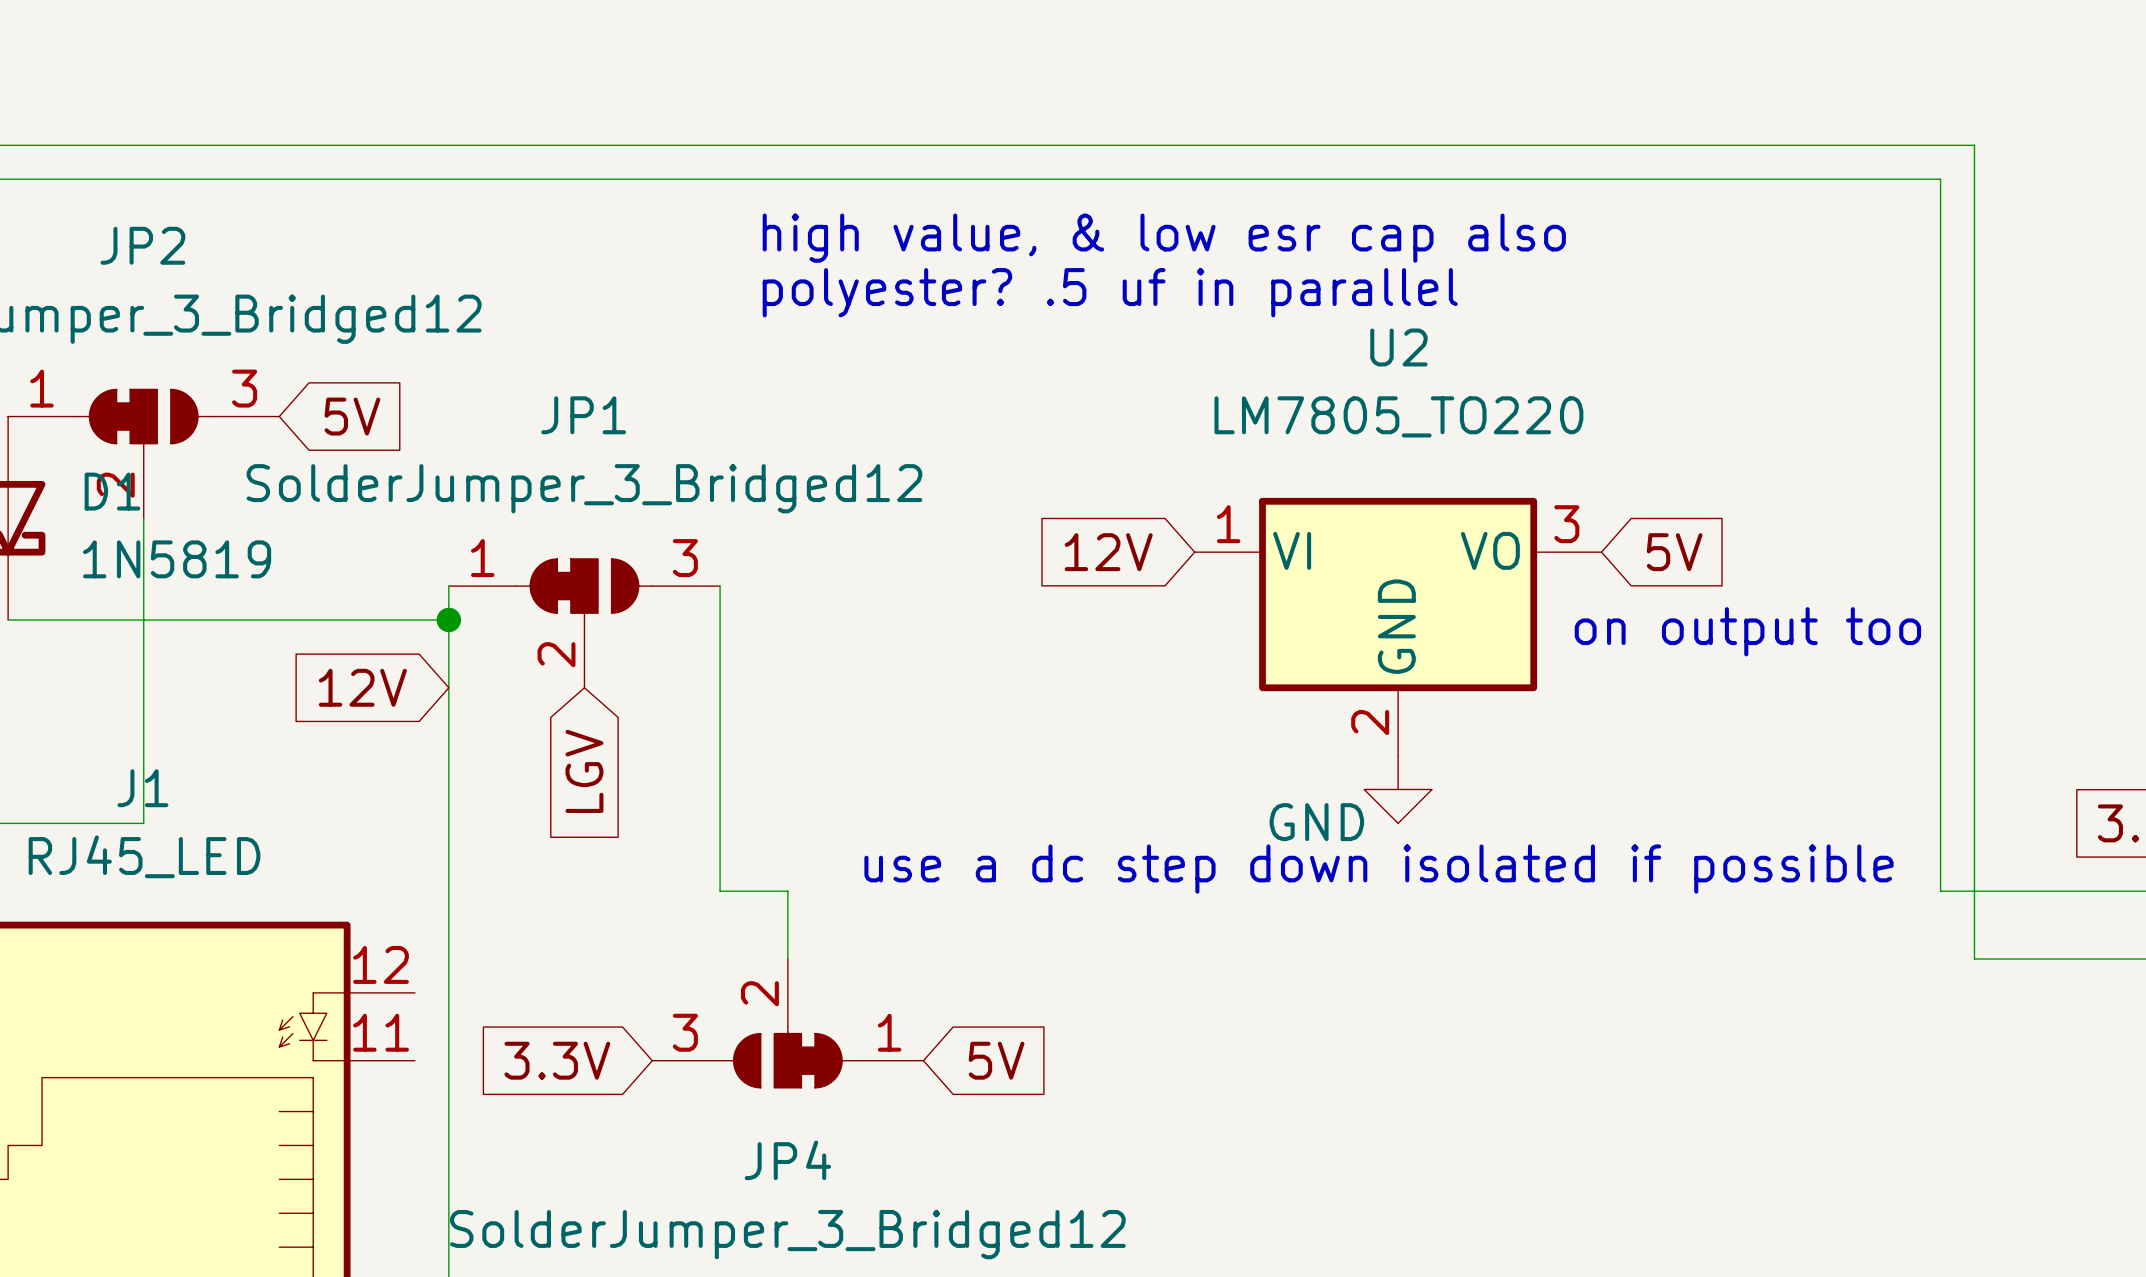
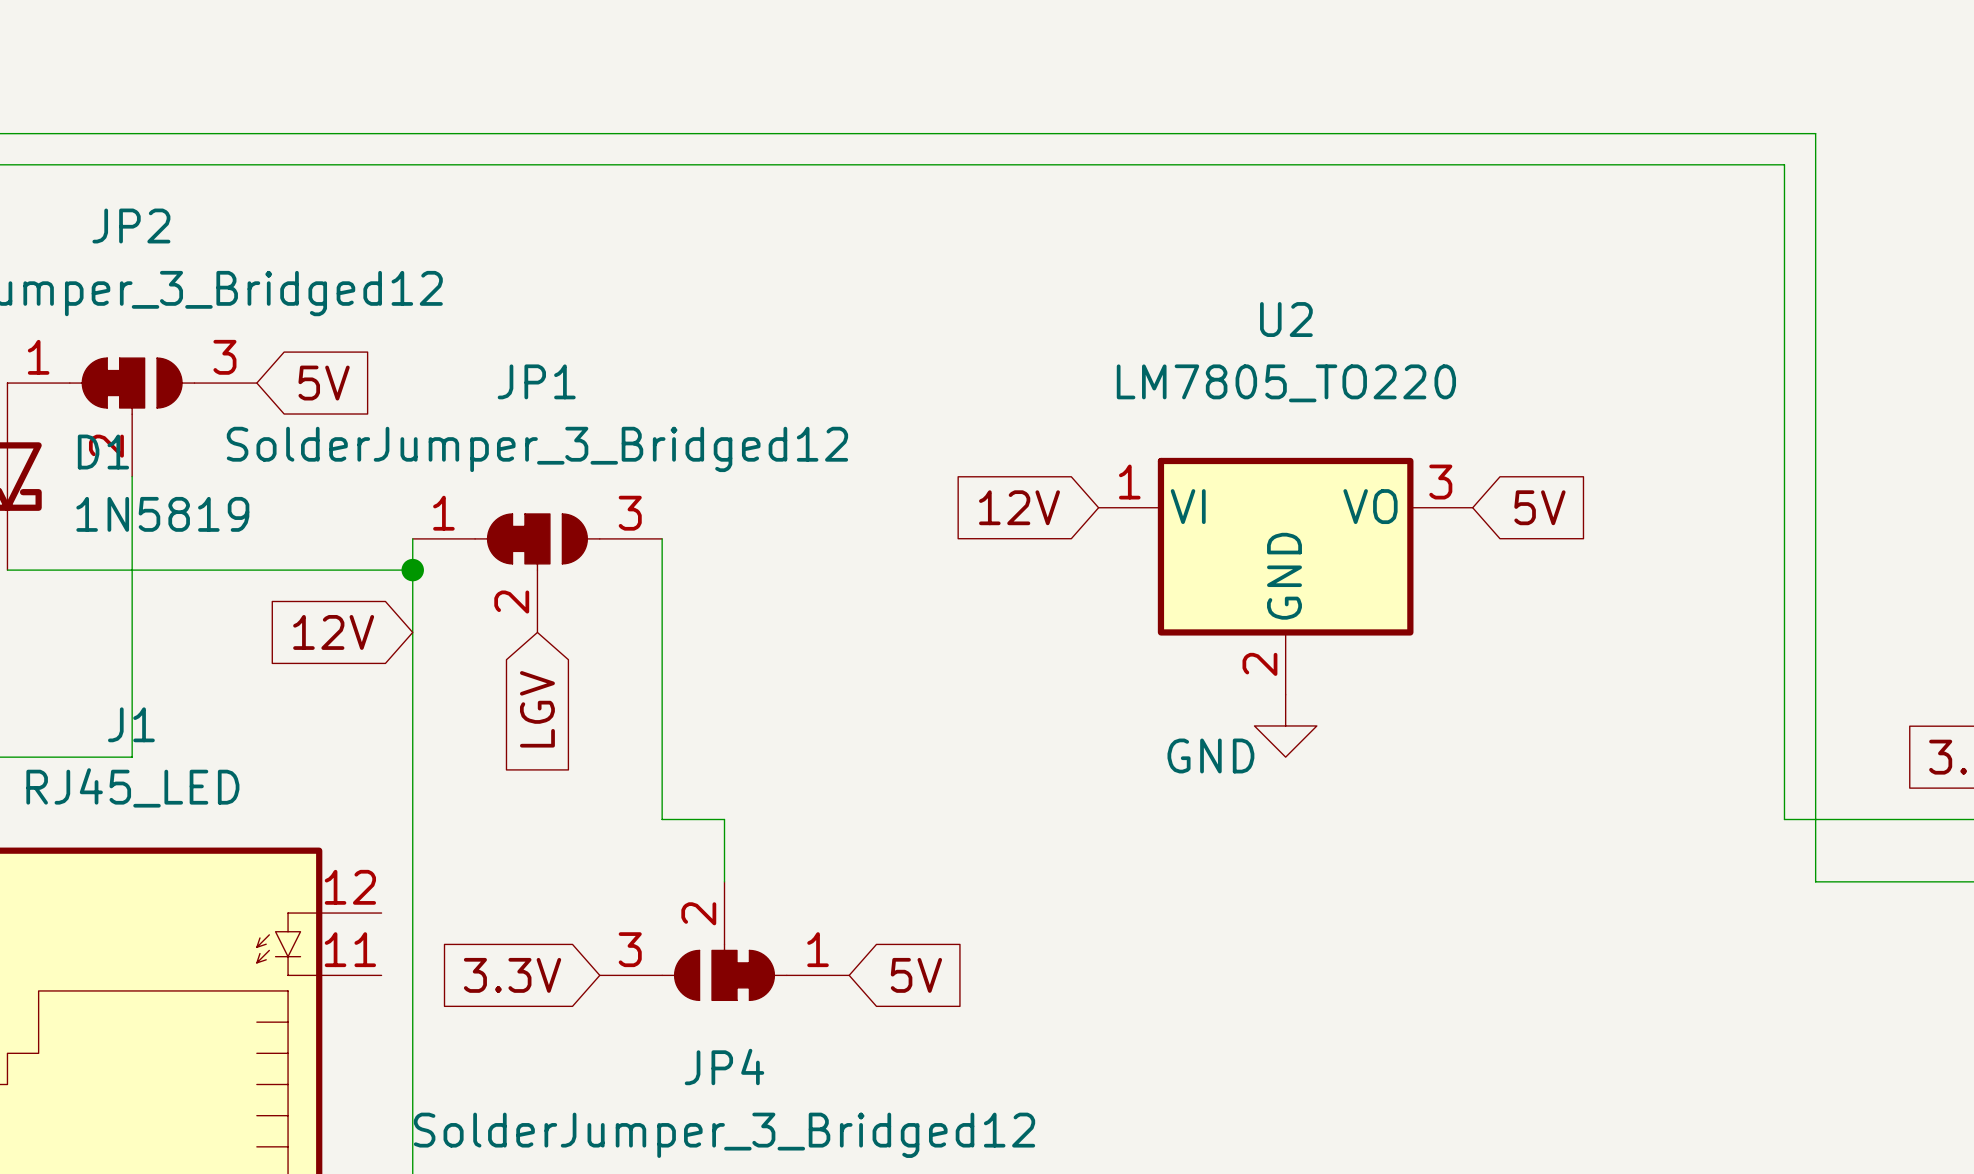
text: high value, & low esr cap also (1164, 238) -> none
text: polyester? .5 uf in parallel (1110, 292) -> none
text: on output too (1747, 631) -> none
text: use a dc step down isolated if possible (1379, 869) -> none

